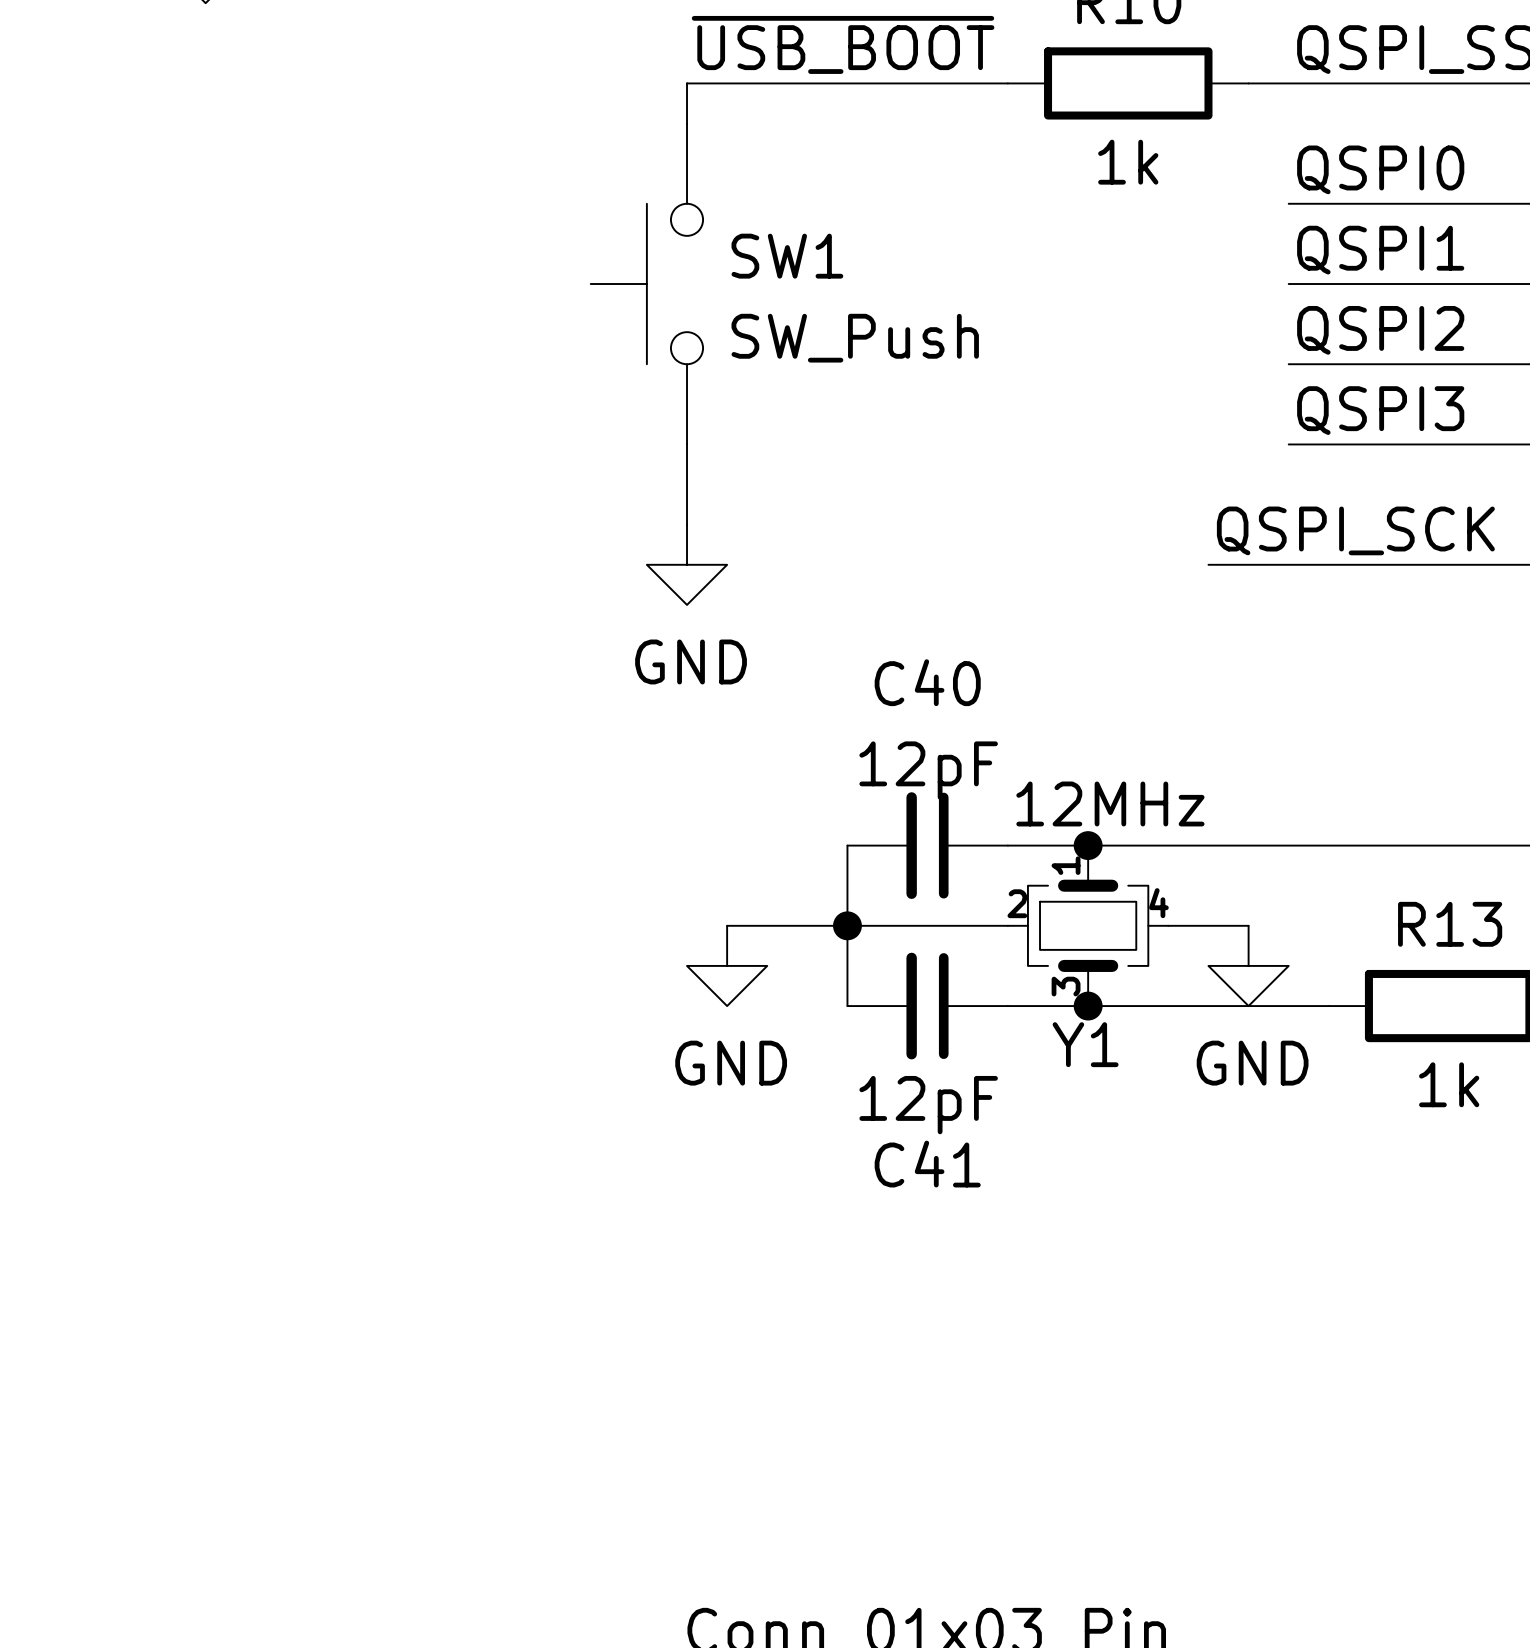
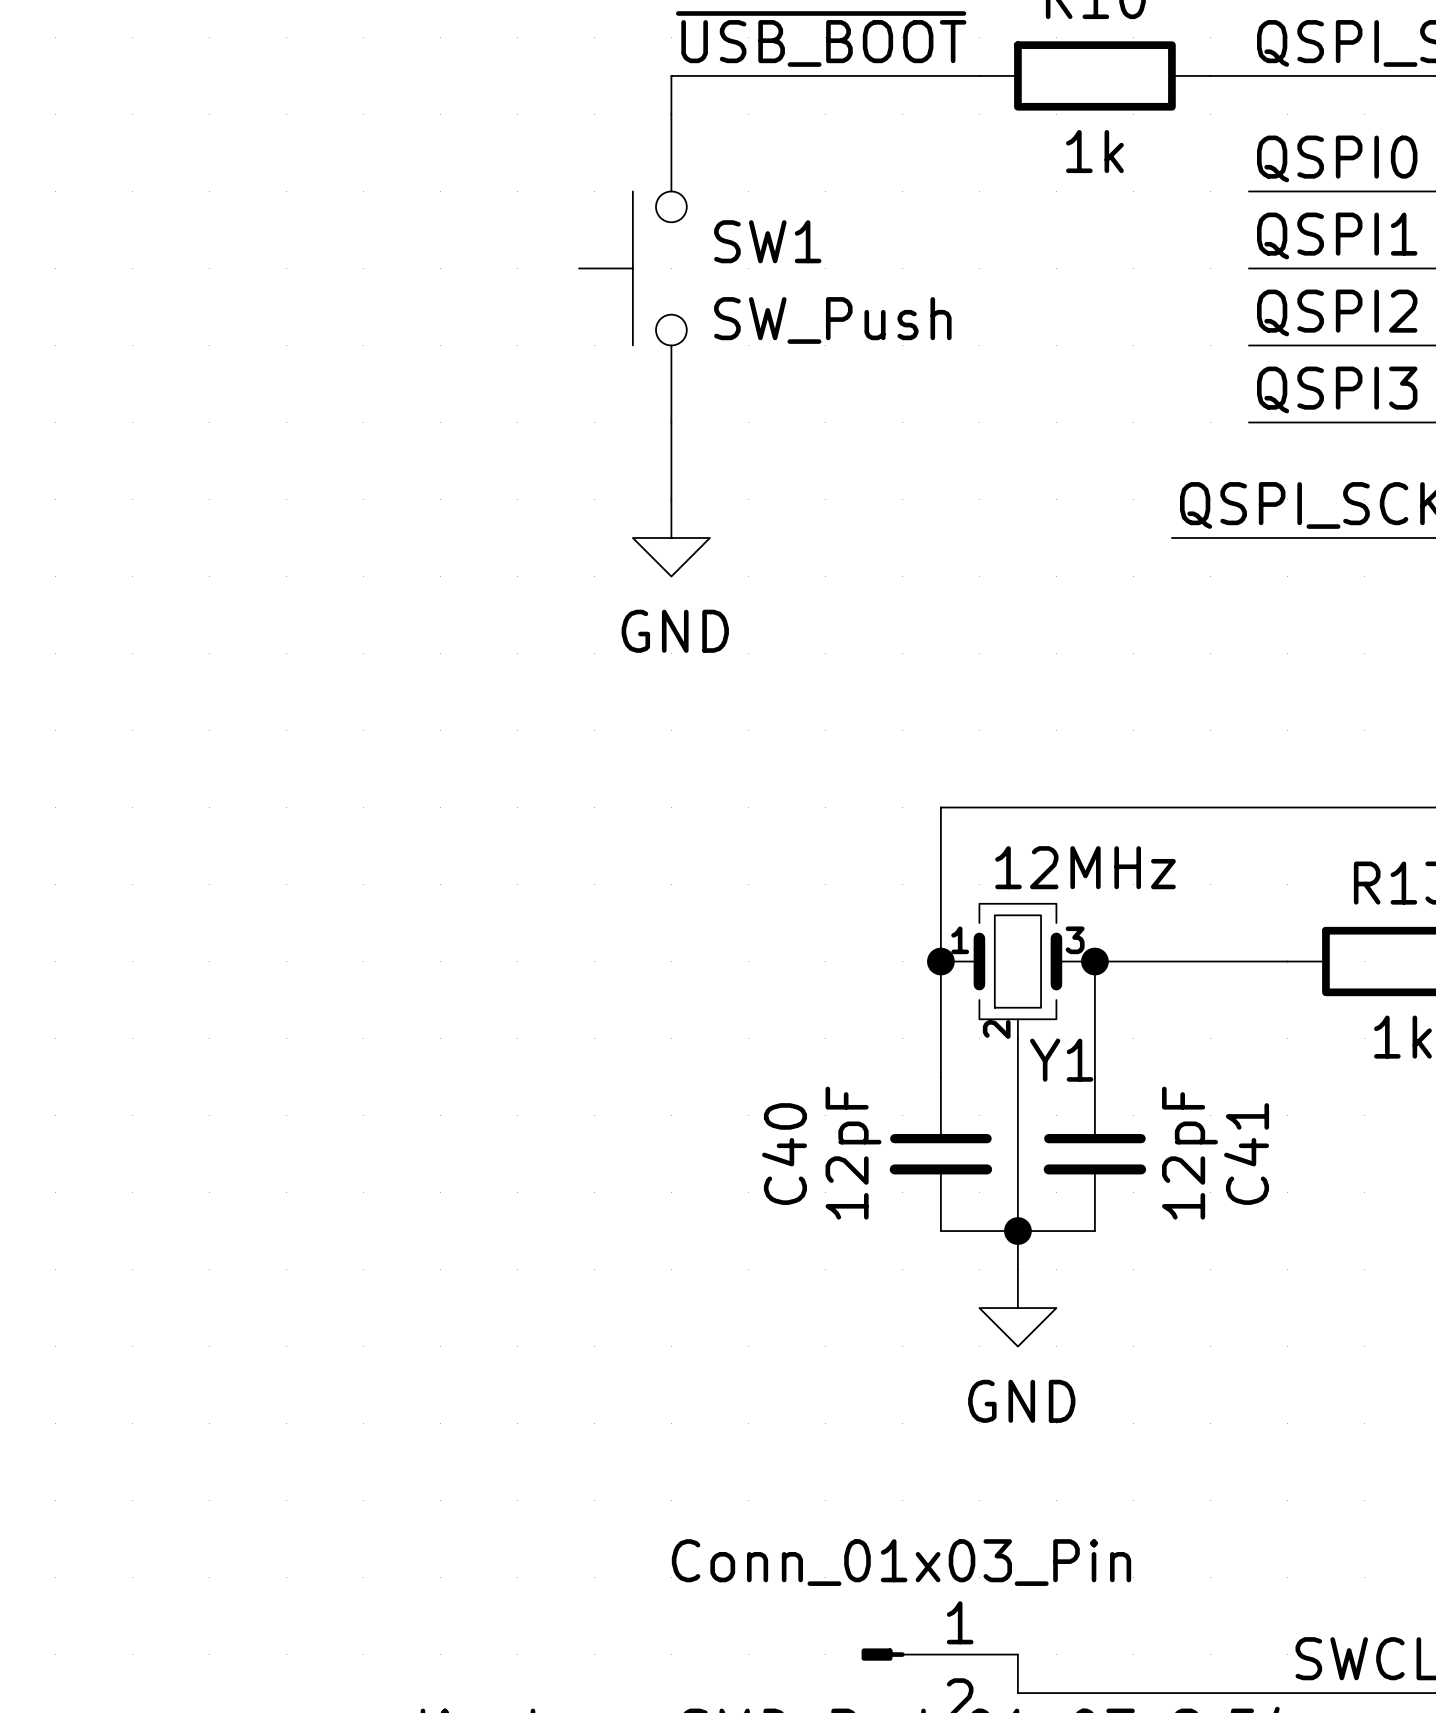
wire: (847, 845) (847, 1006) -> none
C40 rotation: 0° (927, 845) -> 90° counterclockwise (940, 1154)
C40 position: (927, 845) -> (940, 1154)
wire: none -> (979, 807) (940, 807) (940, 1077)
Y1 symbol: [1007, 845, 1169, 1007] -> [940, 903, 1095, 1039]
junction: (1088, 845) -> none
wire: (727, 925) (1007, 925) -> none
junction: (847, 925) -> none
wire: (1168, 925) (1248, 925) -> none
power symbol: GND (727, 965) -> none
power symbol: GND (1248, 965) -> none
C41 rotation: 0° (927, 1006) -> 90° counterclockwise (1094, 1154)
C41 position: (927, 1006) -> (1094, 1154)
junction: none -> (940, 961)
wire: (1007, 1006) (1128, 1006) -> (1094, 1077) (1094, 961)
junction position: (1088, 1006) -> (1094, 961)
wire: none -> (1017, 1038) (1017, 1269)
wire: none -> (940, 1231) (1094, 1231)
junction: none -> (1017, 1231)
power symbol: none -> GND (1017, 1308)

